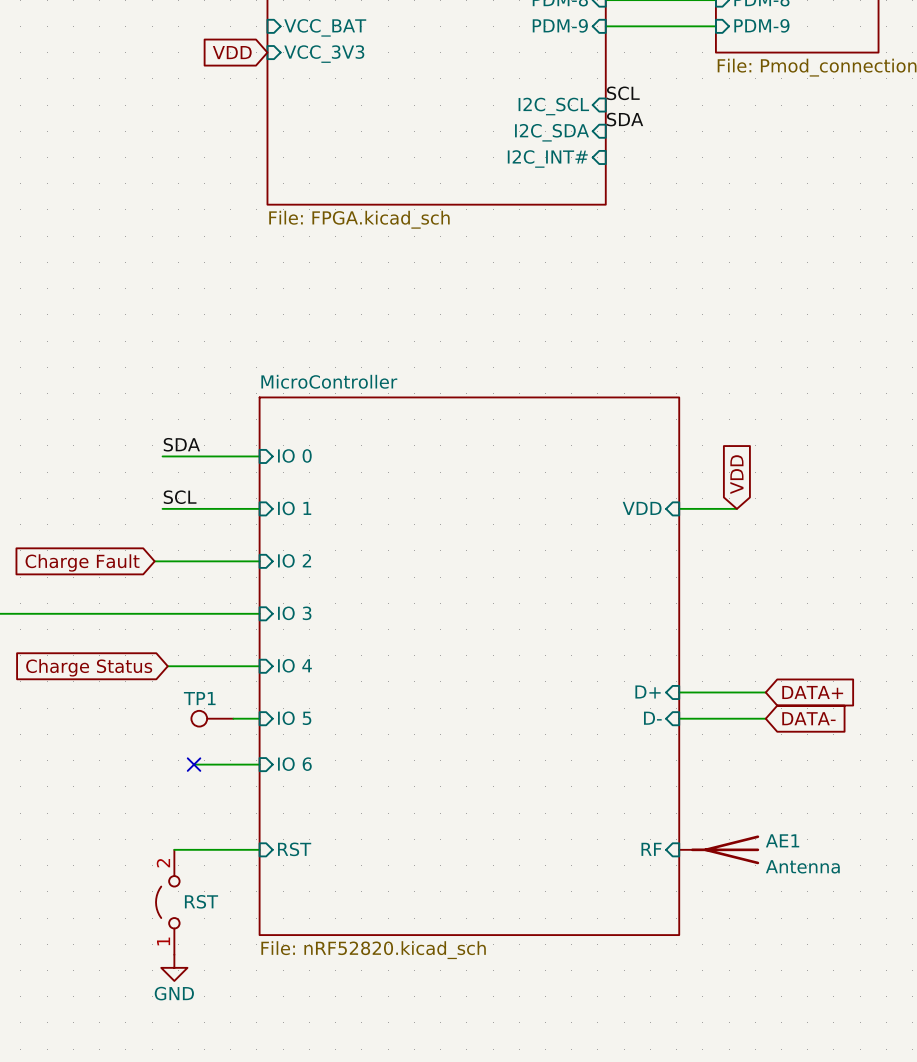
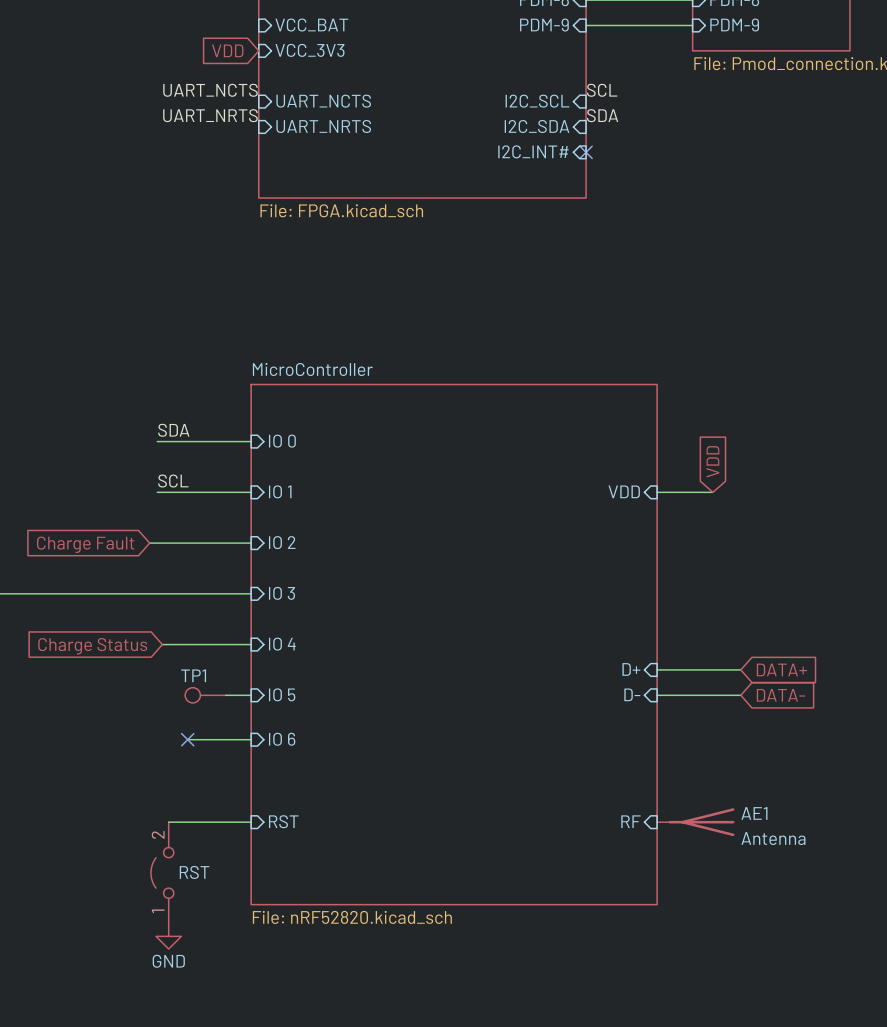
label: none -> UART_NCTS (210, 90)
sheet pin: none -> UART_NCTS (323, 101)
label: none -> UART_NRTS (210, 115)
sheet pin: none -> UART_NRTS (323, 126)
no-connect mark: none -> (586, 152)

